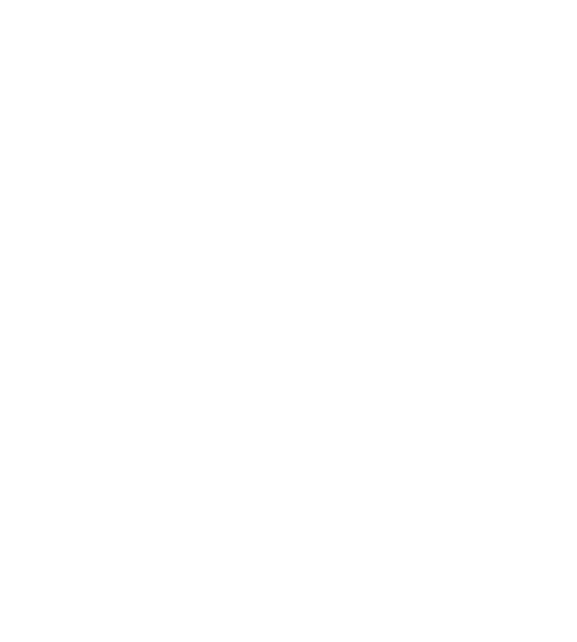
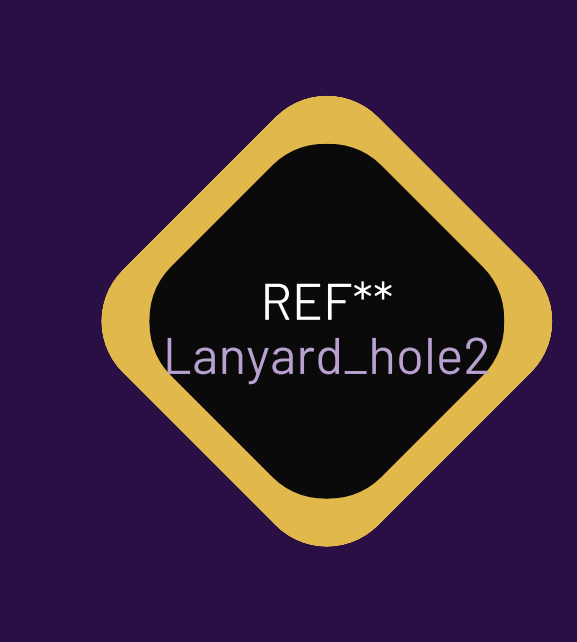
REF**: none -> Lanyard_hole2 (326, 321)

